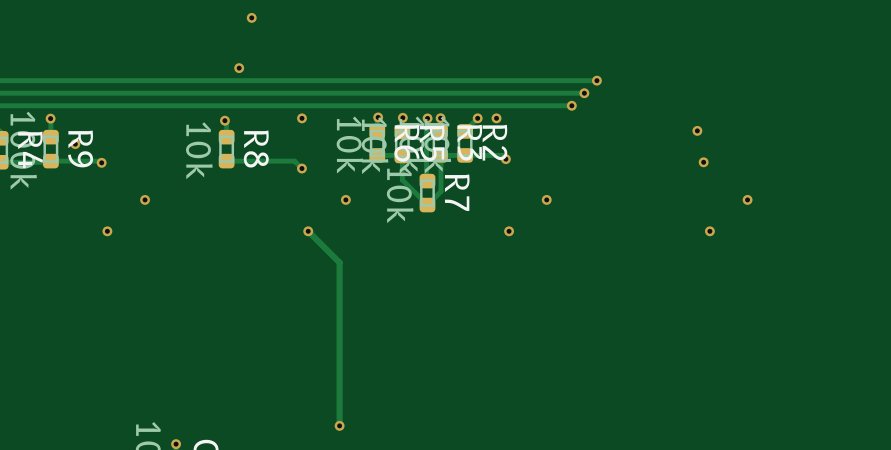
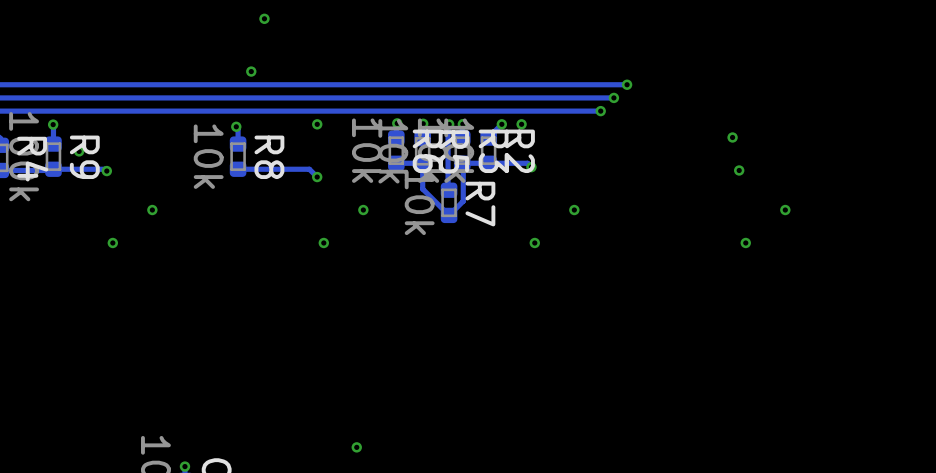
track: (308, 231) (339, 262) (339, 425) -> none

